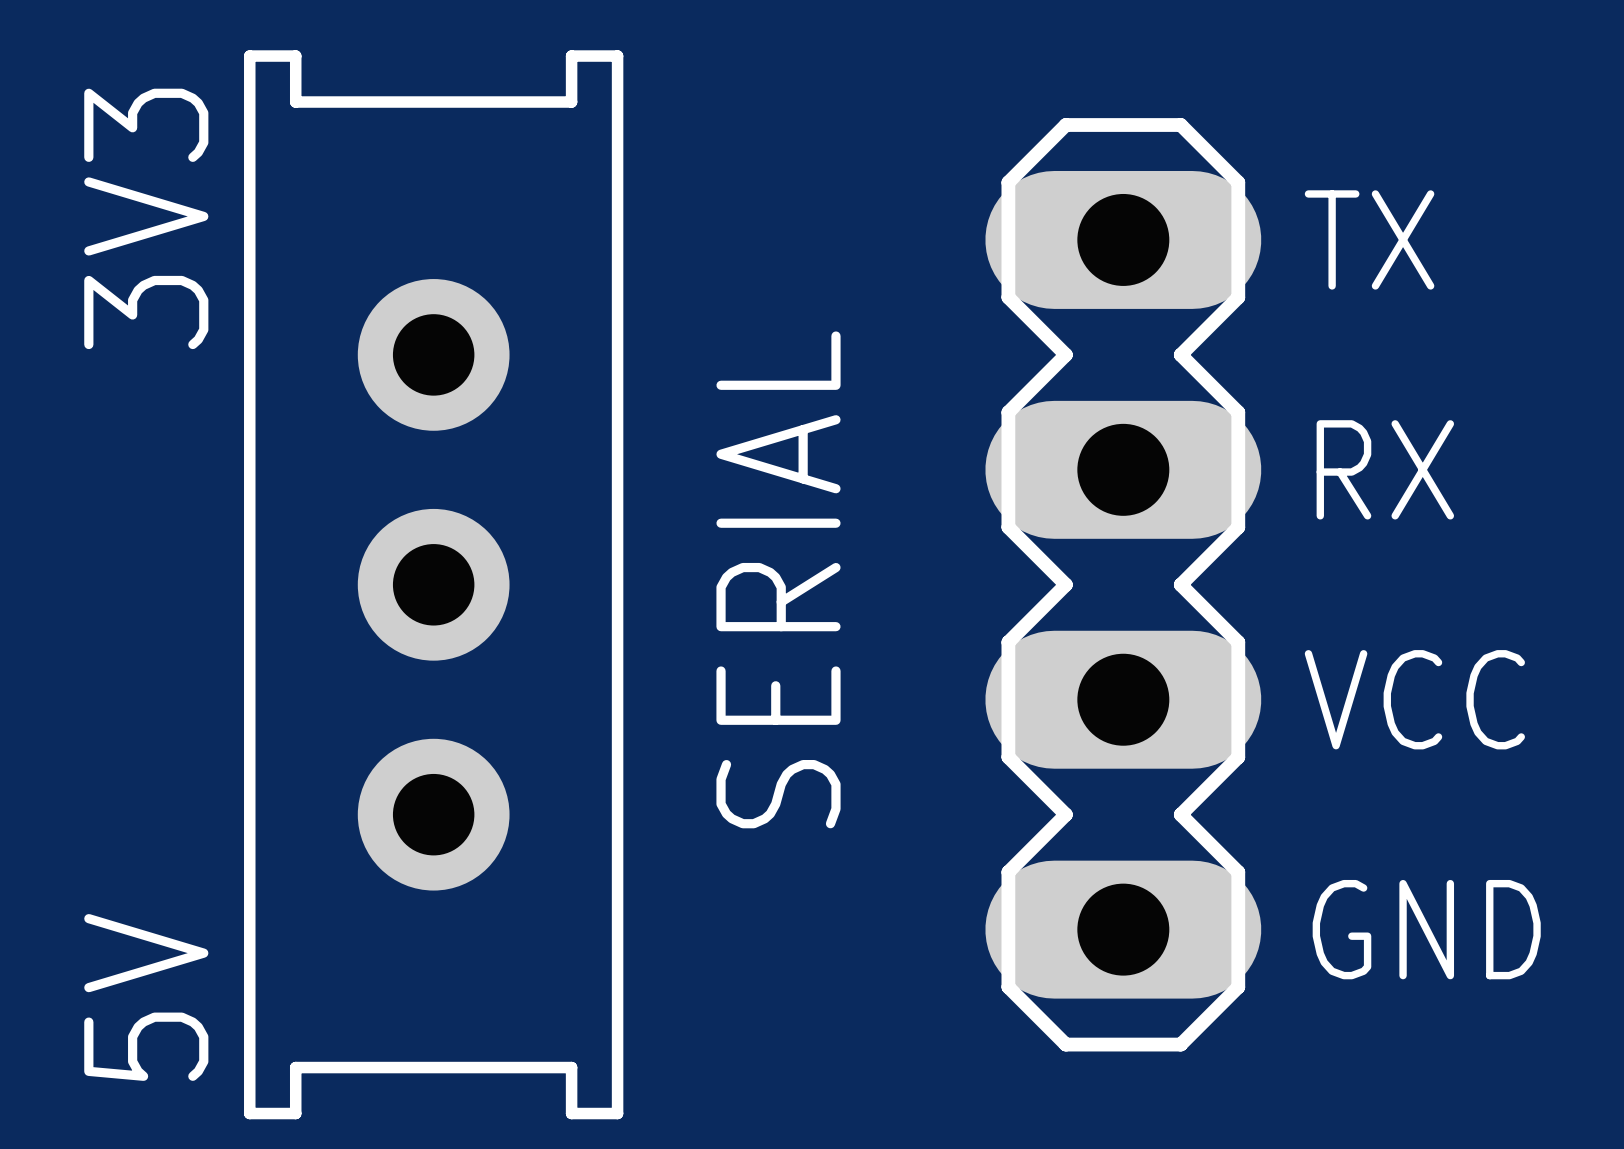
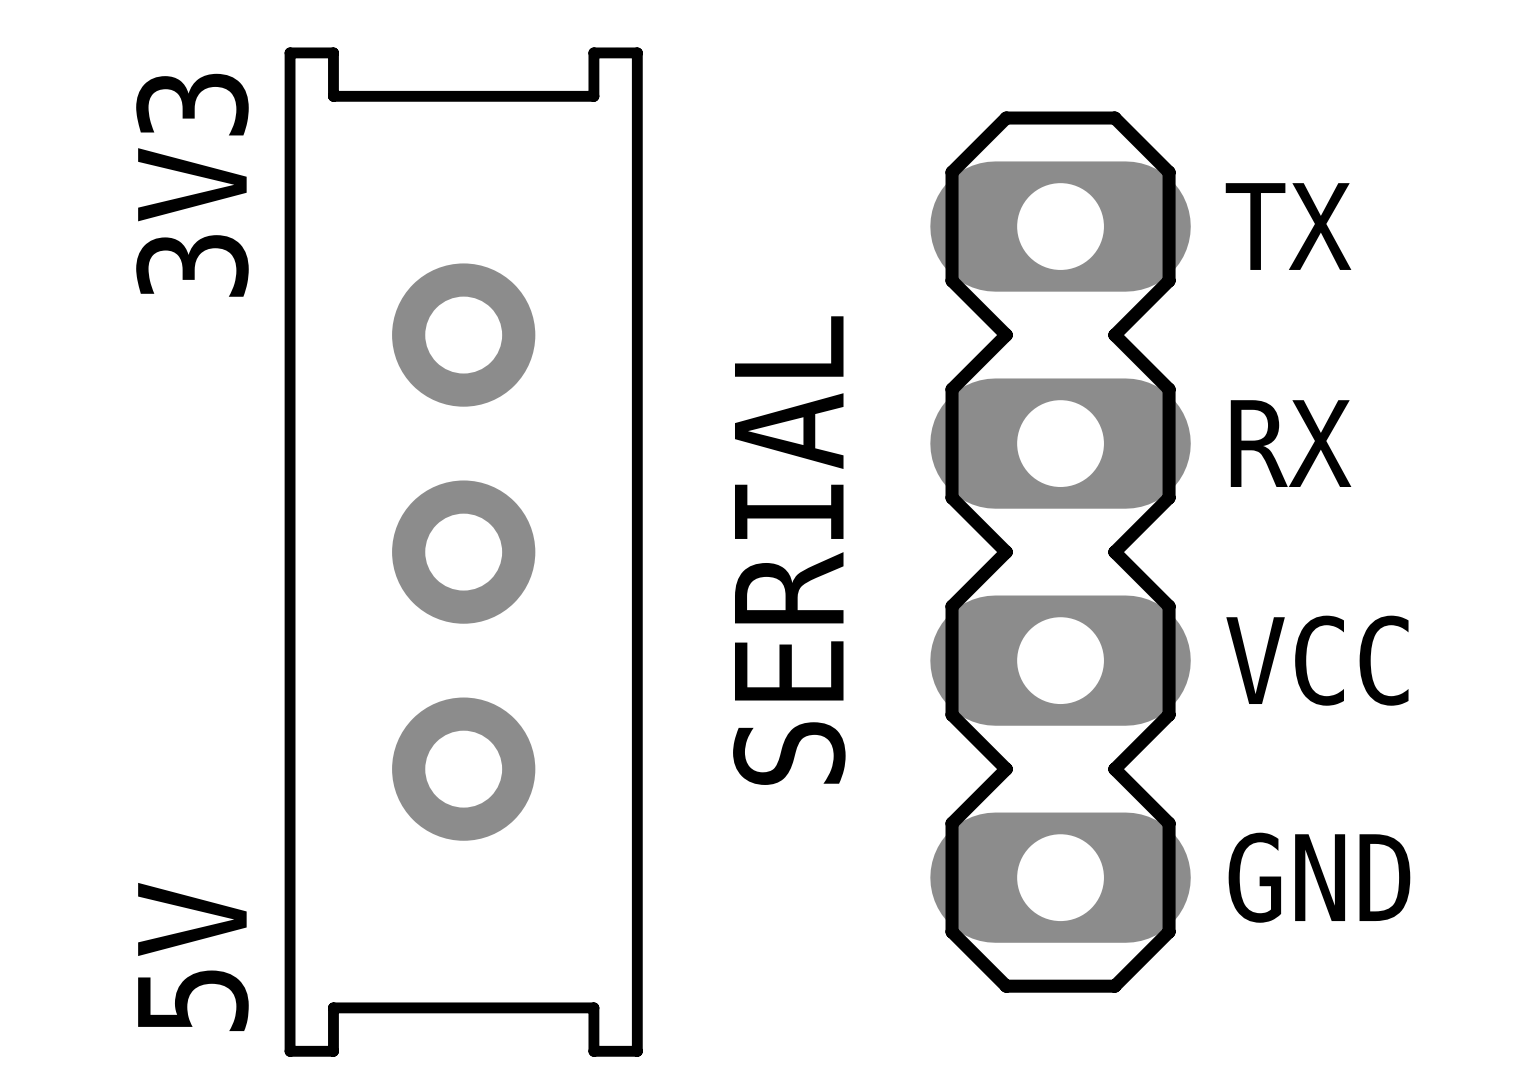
text position: 3V3 (146, 218) -> 3V3 (192, 185)
text position: SERIAL (778, 579) -> SERIAL (789, 550)
part position: (433, 584) -> (463, 552)
text position: 5V (146, 997) -> 5V (193, 956)

